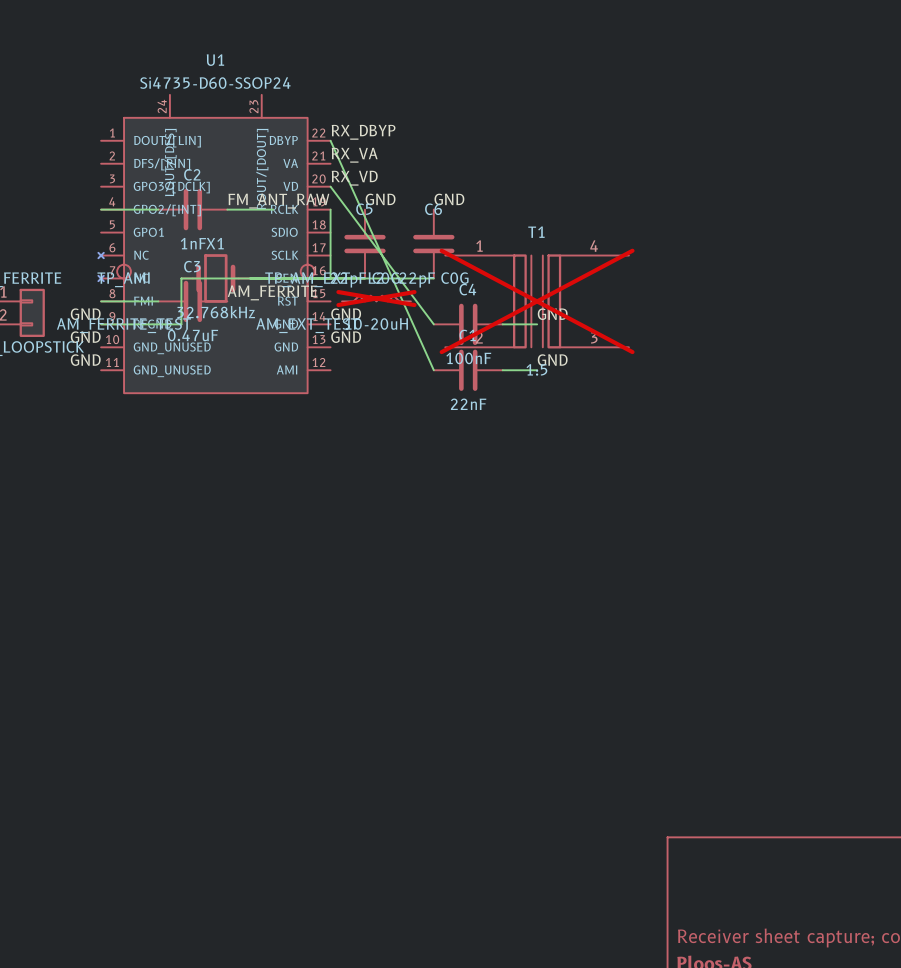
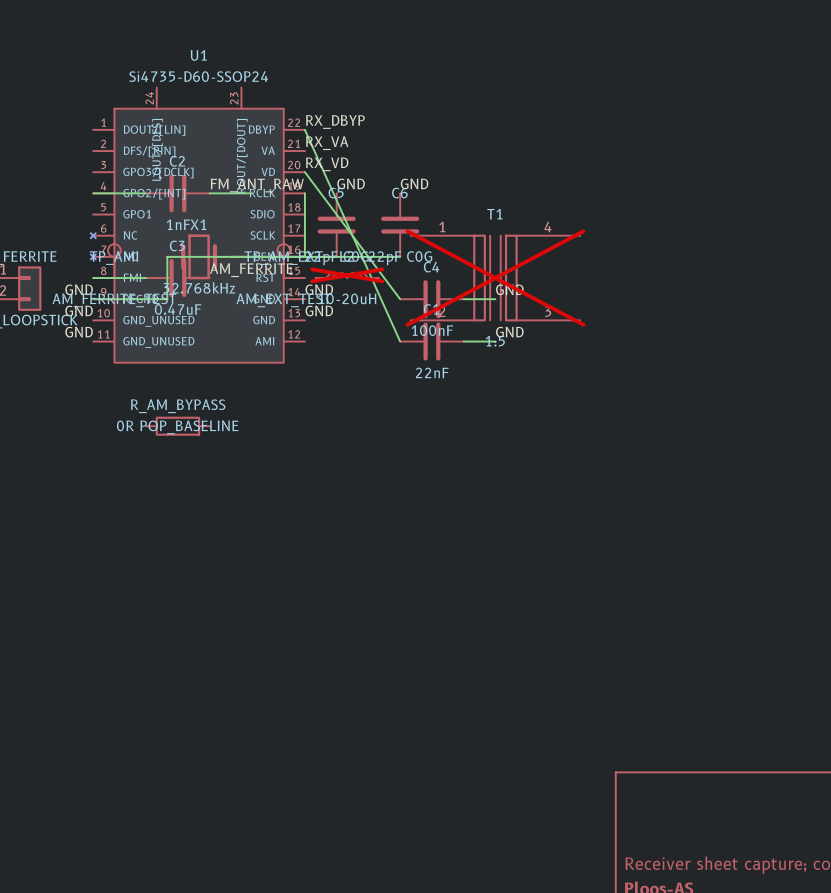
R_AM_BYPASS: none -> 0R POP_BASELINE (177, 426)

